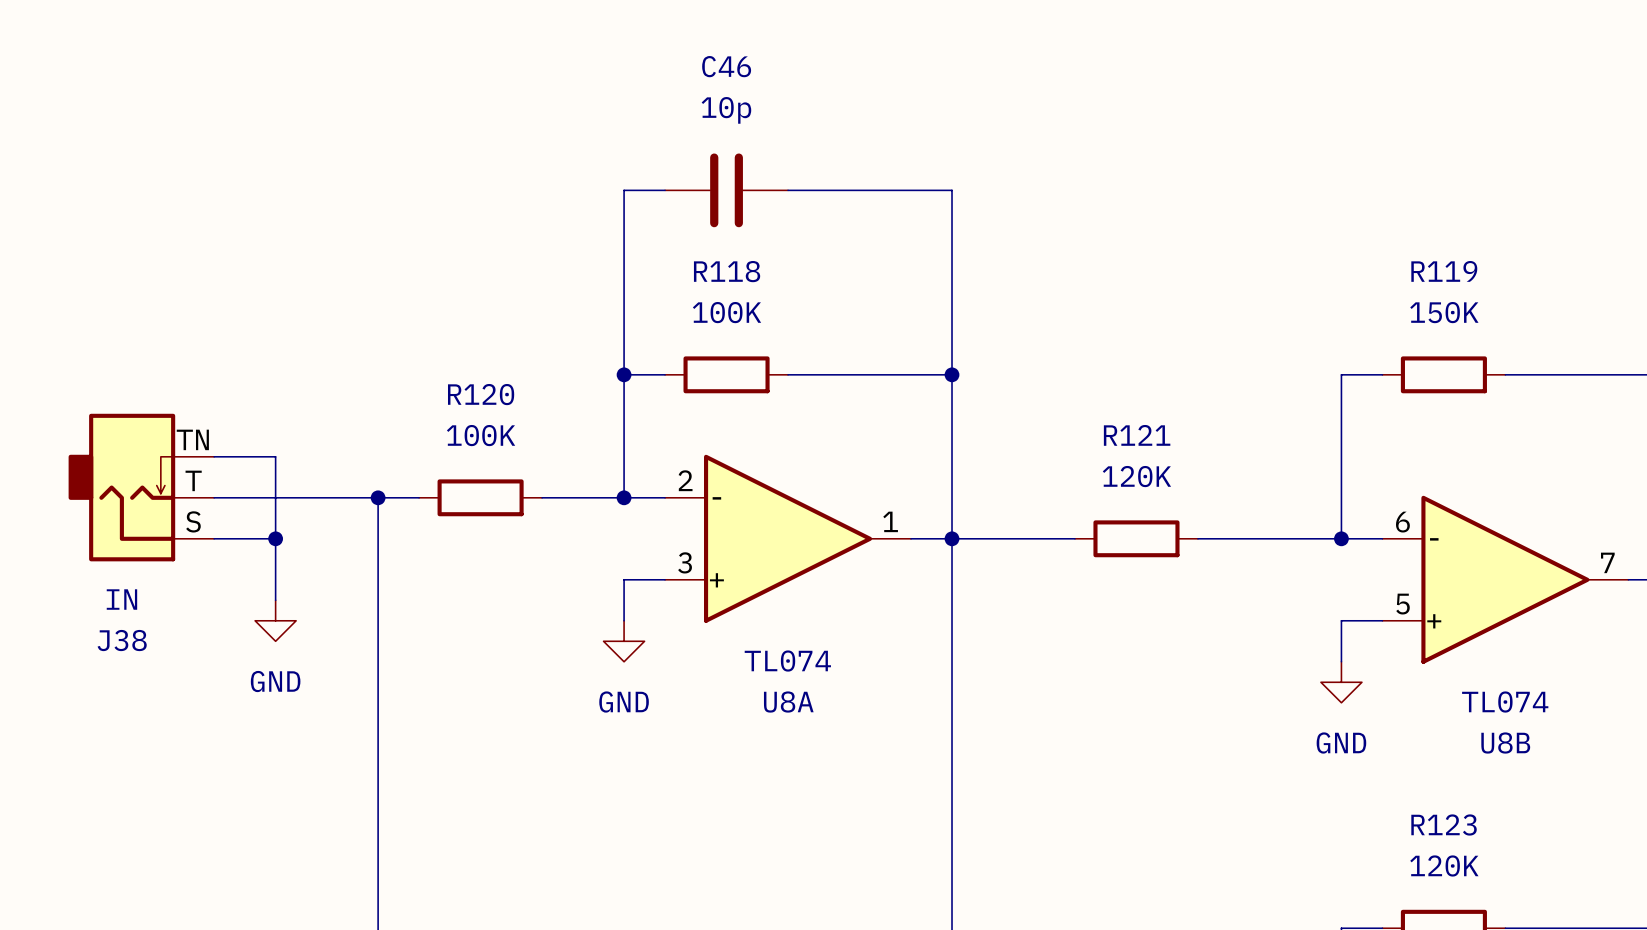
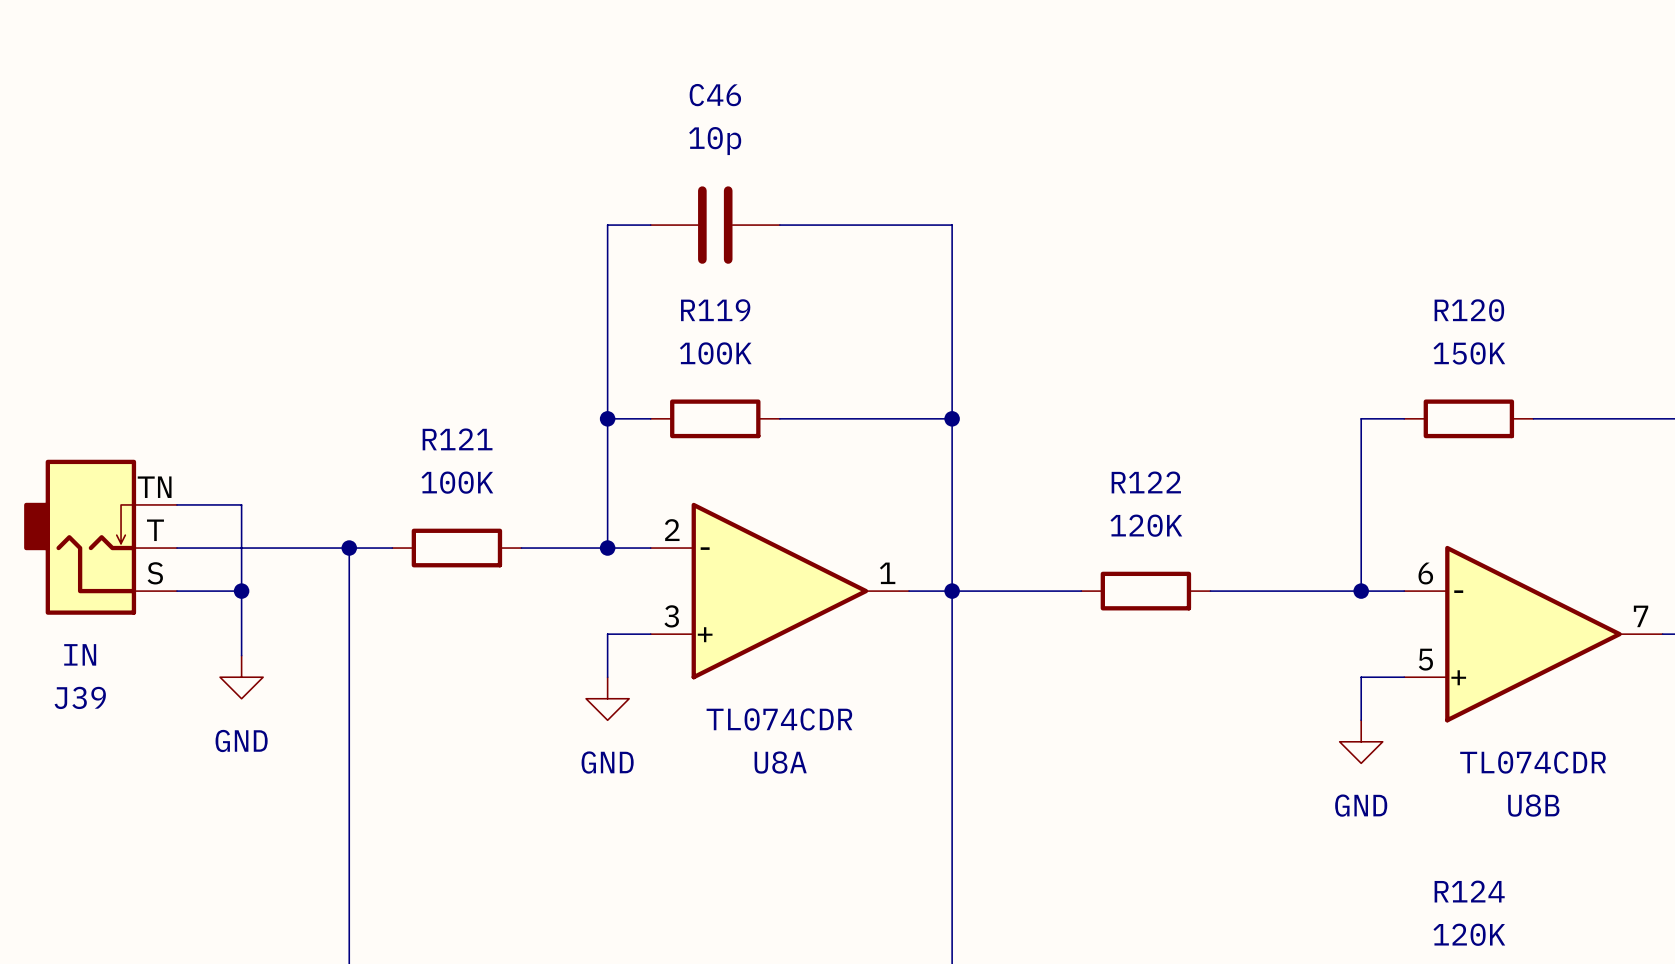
R118 name: R118 (727, 271) -> R119 (715, 310)
R119 name: R119 (1444, 271) -> R120 (1469, 310)
R120 name: R120 (481, 394) -> R121 (457, 439)
R121 name: R121 (1137, 435) -> R122 (1146, 482)
J38 name: J38 (122, 640) -> J39 (80, 697)
U8A value: TL074 (787, 661) -> TL074CDR (779, 719)
U8B value: TL074 (1505, 702) -> TL074CDR (1533, 762)
R123 name: R123 (1444, 824) -> R124 (1469, 891)

